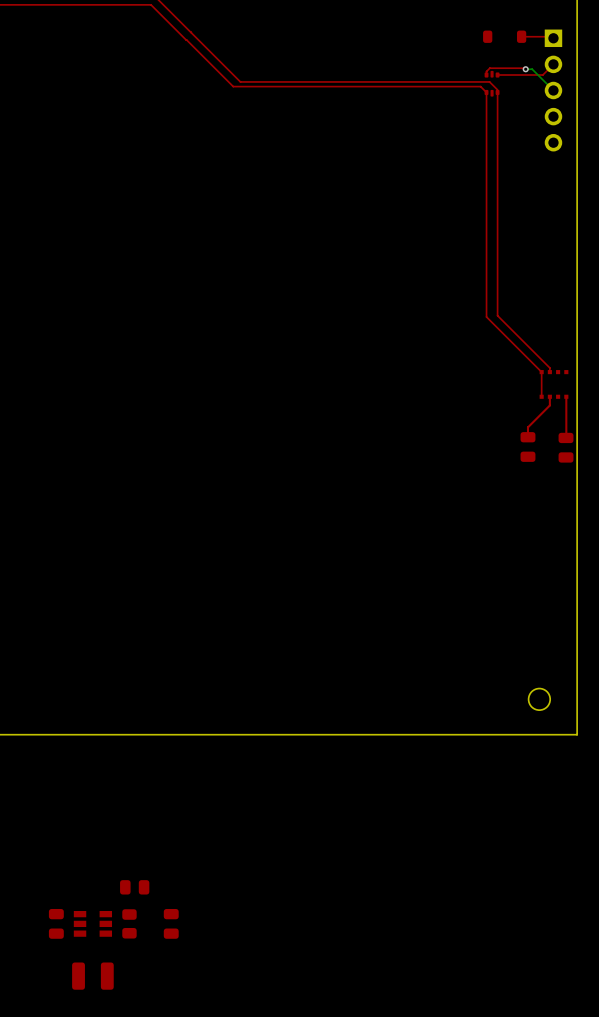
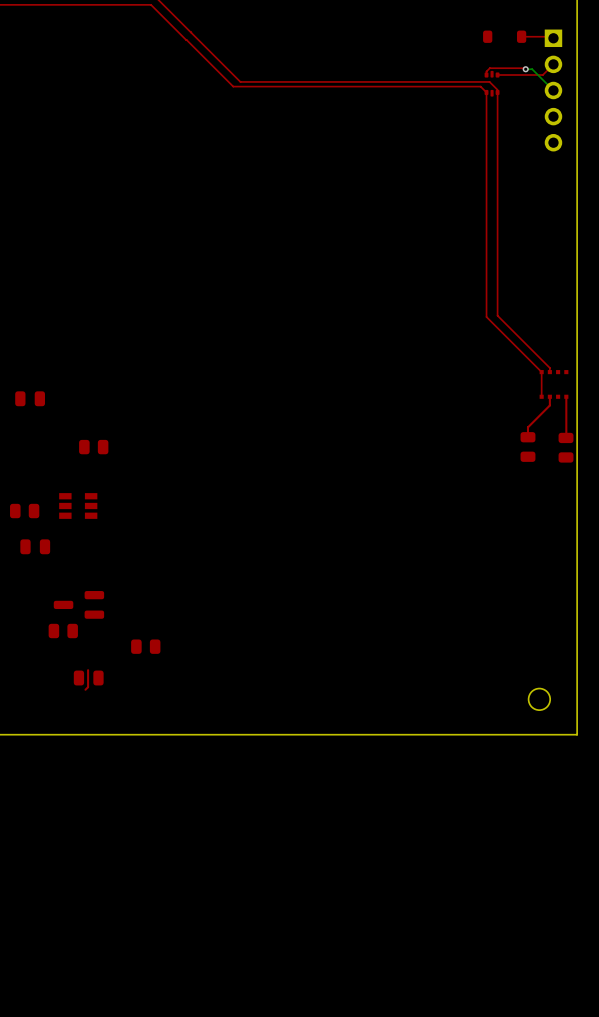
part: none -> (30, 398)
part: none -> (93, 447)
part: none -> (78, 505)
part: none -> (24, 511)
part: none -> (35, 546)
part: none -> (78, 604)
part: none -> (63, 631)
part: none -> (145, 646)
top track: none -> (88, 670) (88, 687) (85, 689)
part: none -> (88, 678)
part: (134, 887) -> none
part: (56, 923) -> none
part: (92, 923) -> none
part: (129, 923) -> none
part: (171, 923) -> none
part: (92, 976) -> none

